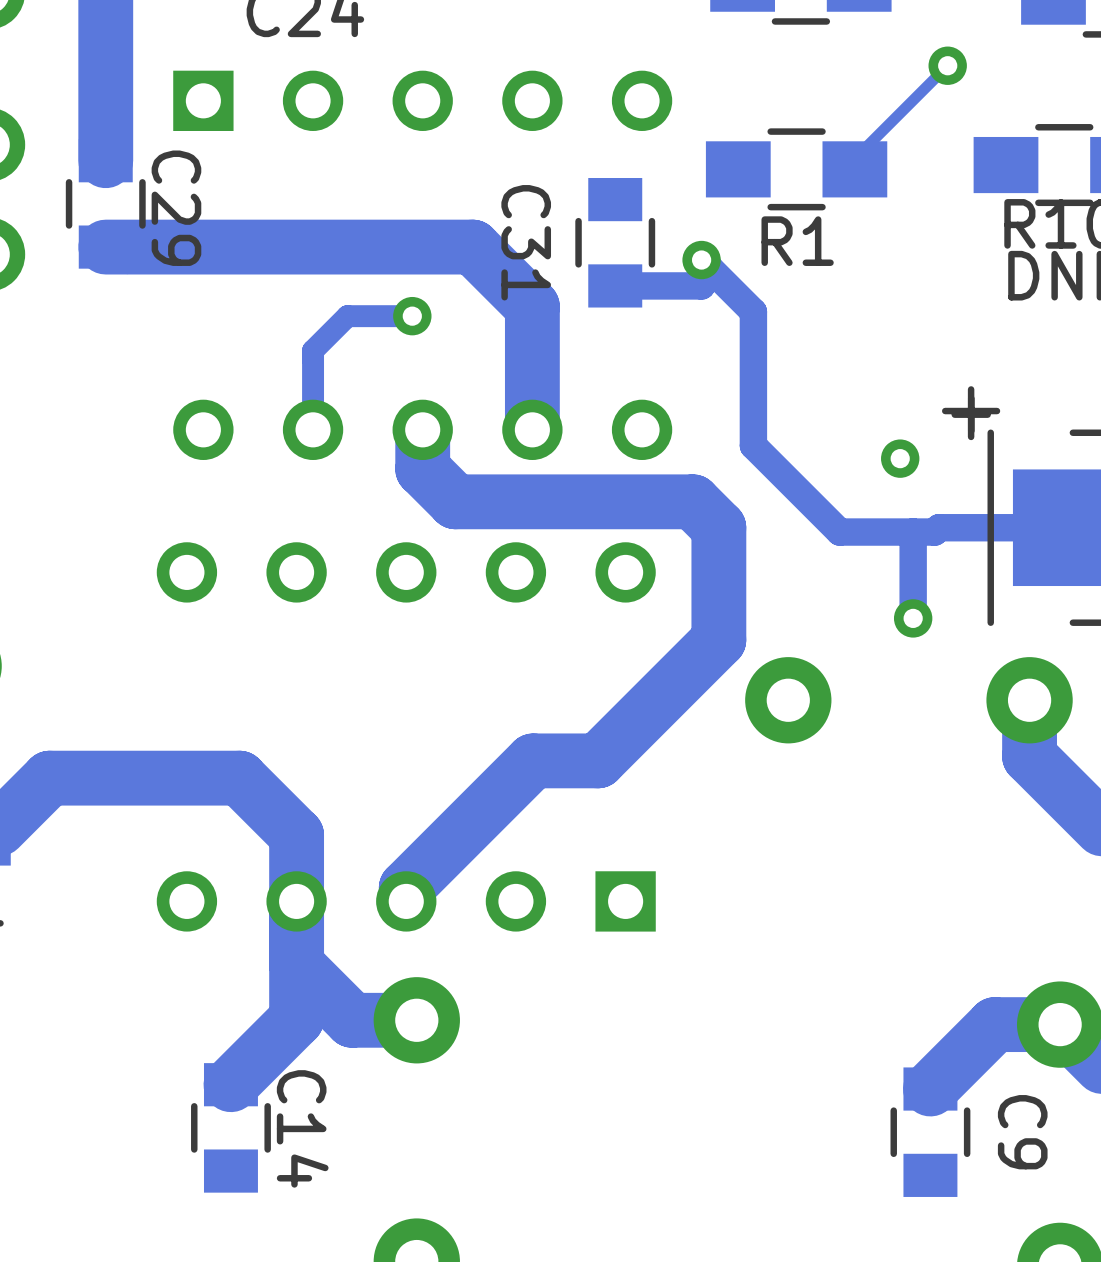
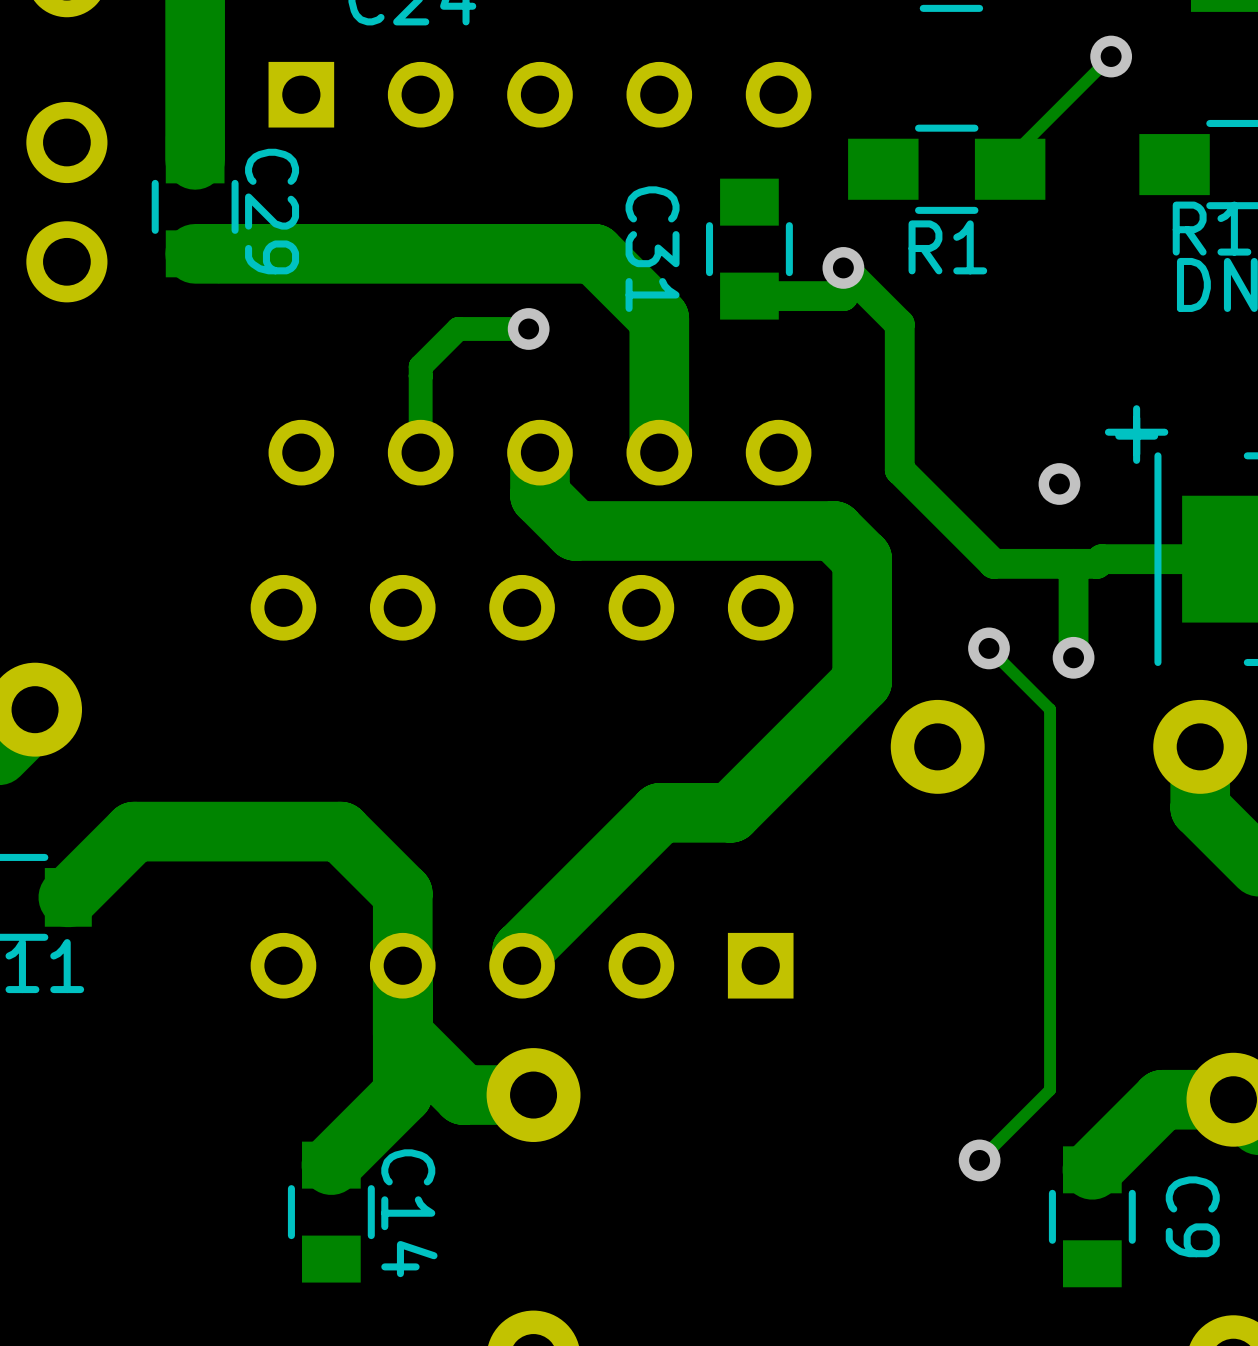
track: none -> (989, 648) (1050, 709) (1050, 1089) (979, 1160)
via: none -> (989, 648)
via: none -> (979, 1160)

